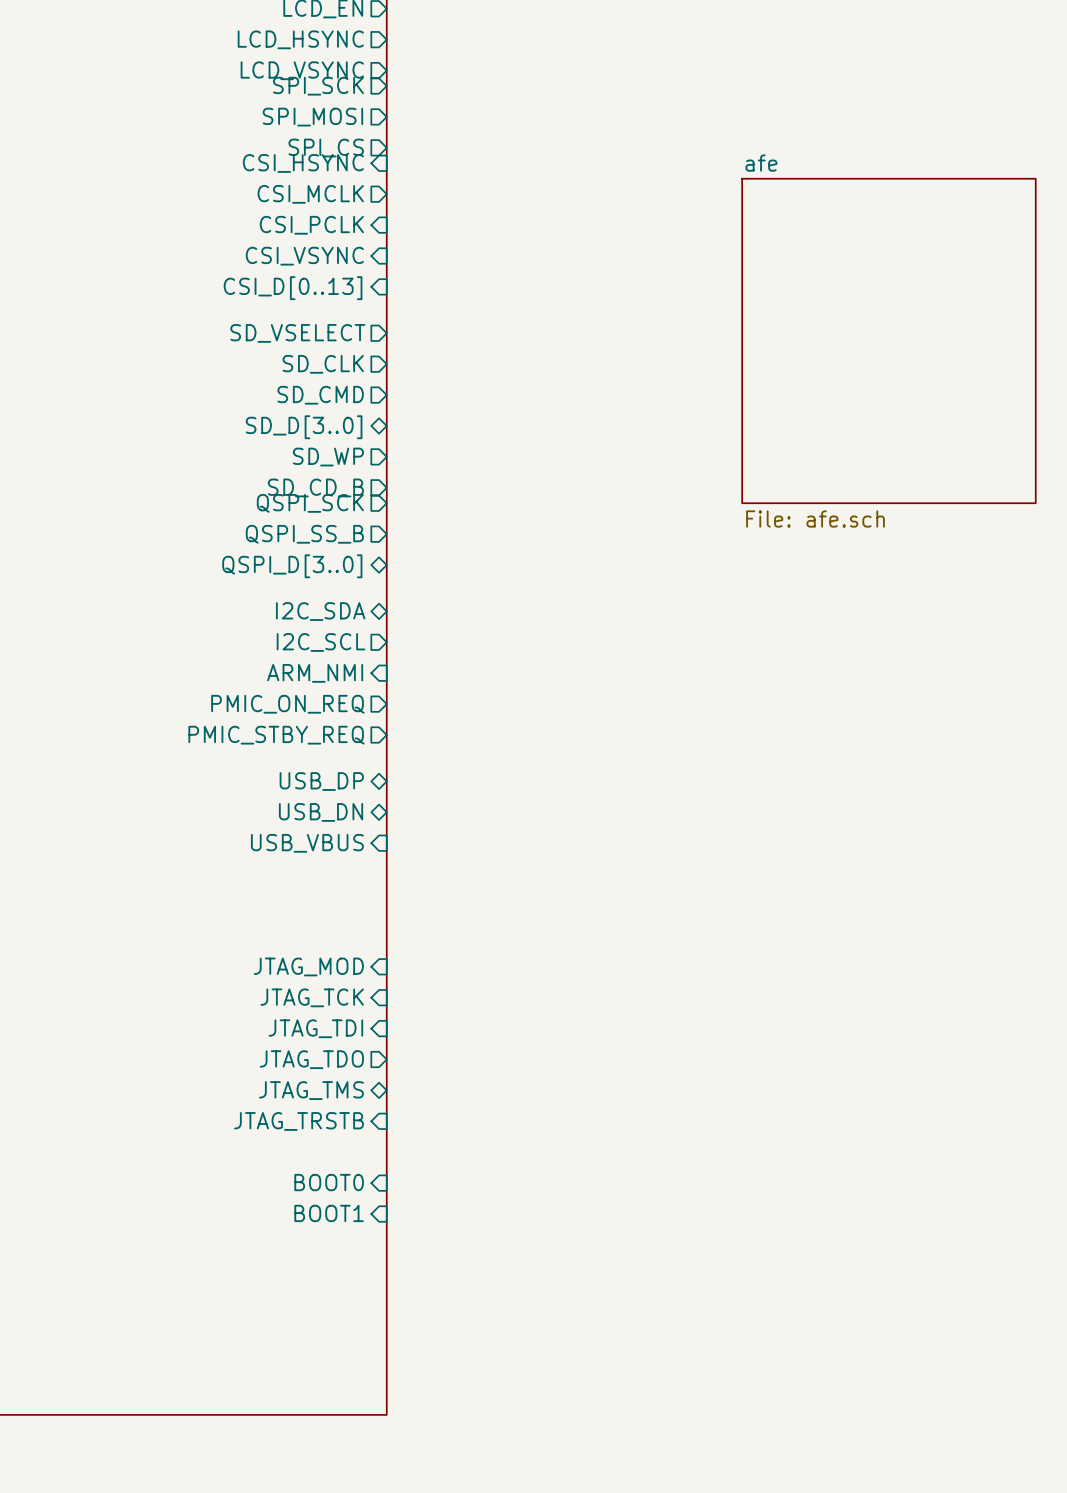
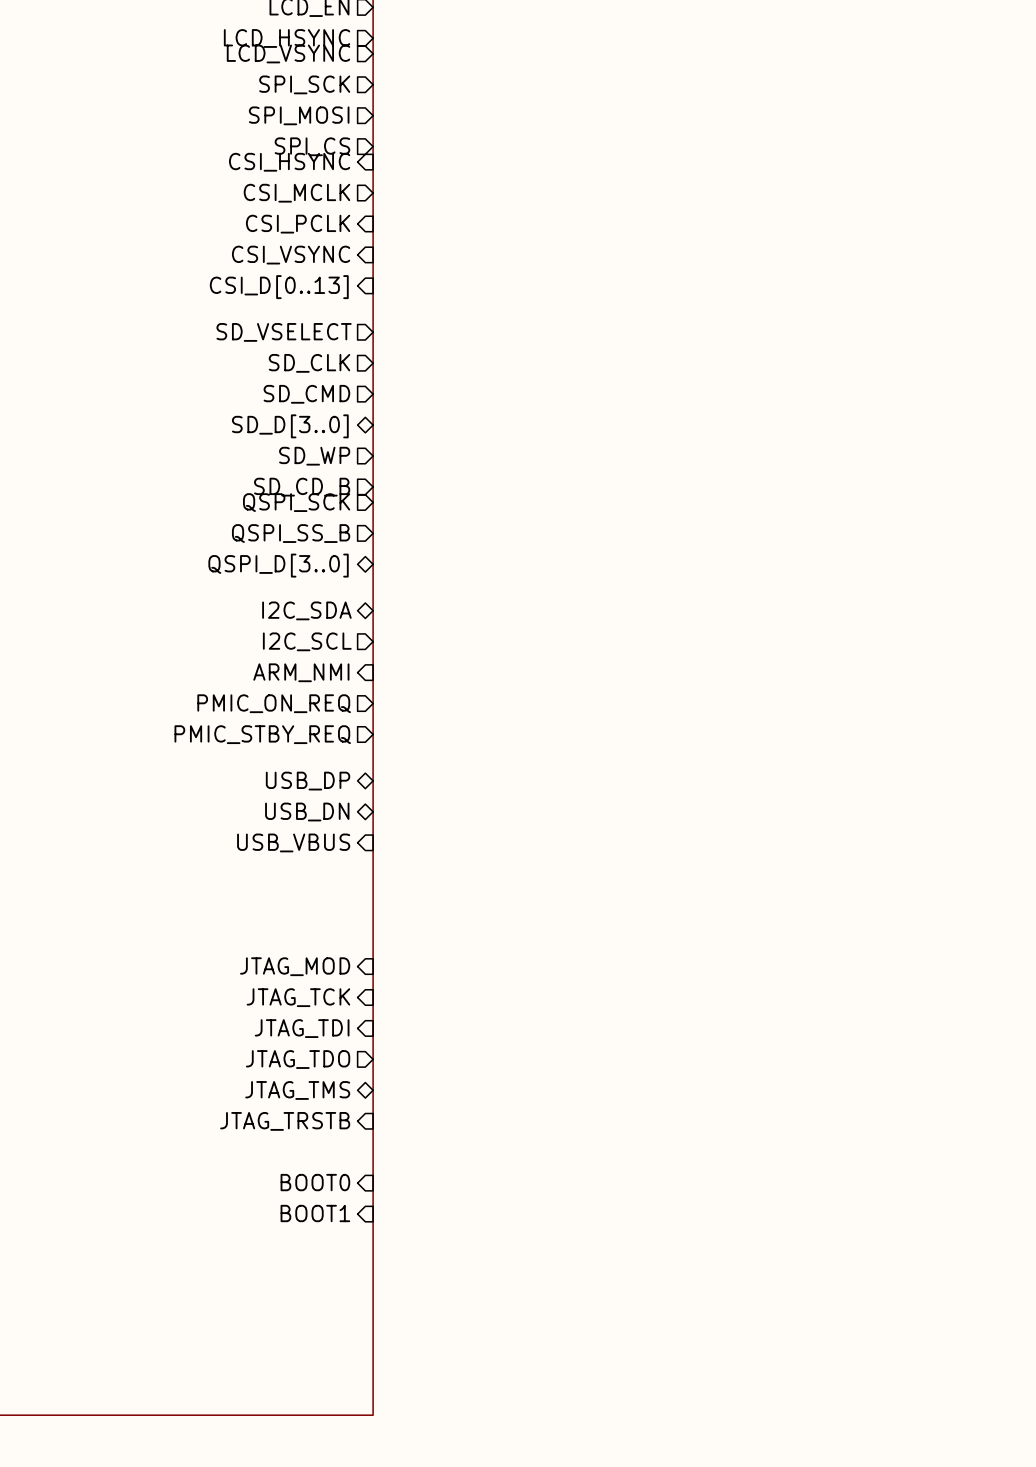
sheet pin position: LCD_VSYNC (302, 70) -> LCD_VSYNC (288, 53)
sheet afe: File: afe.sch (888, 340) -> none

